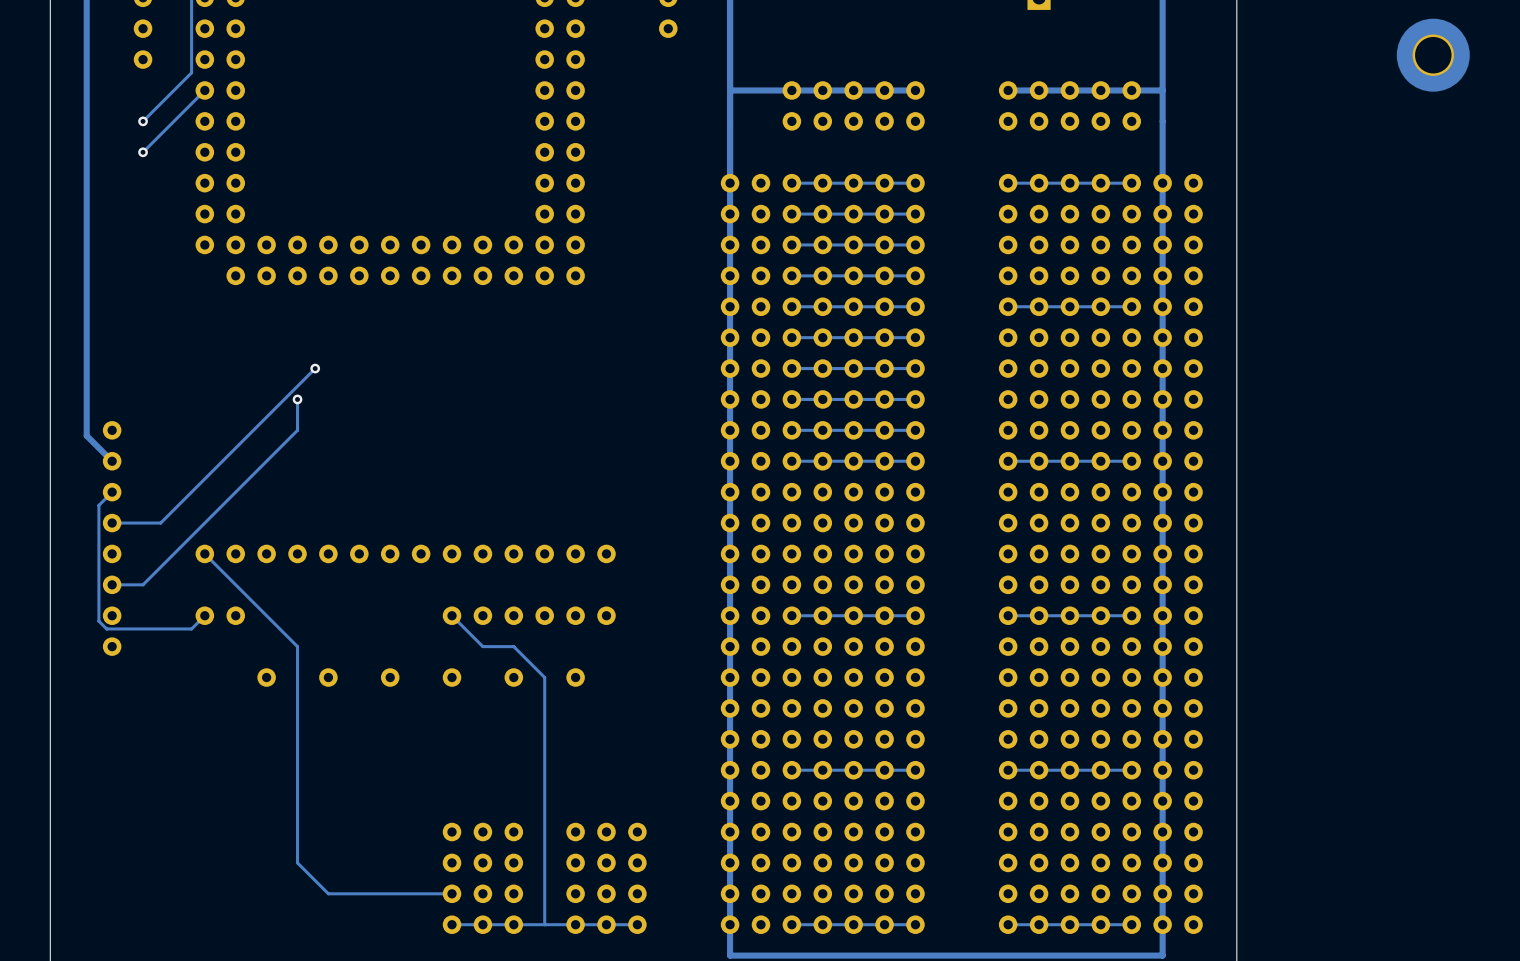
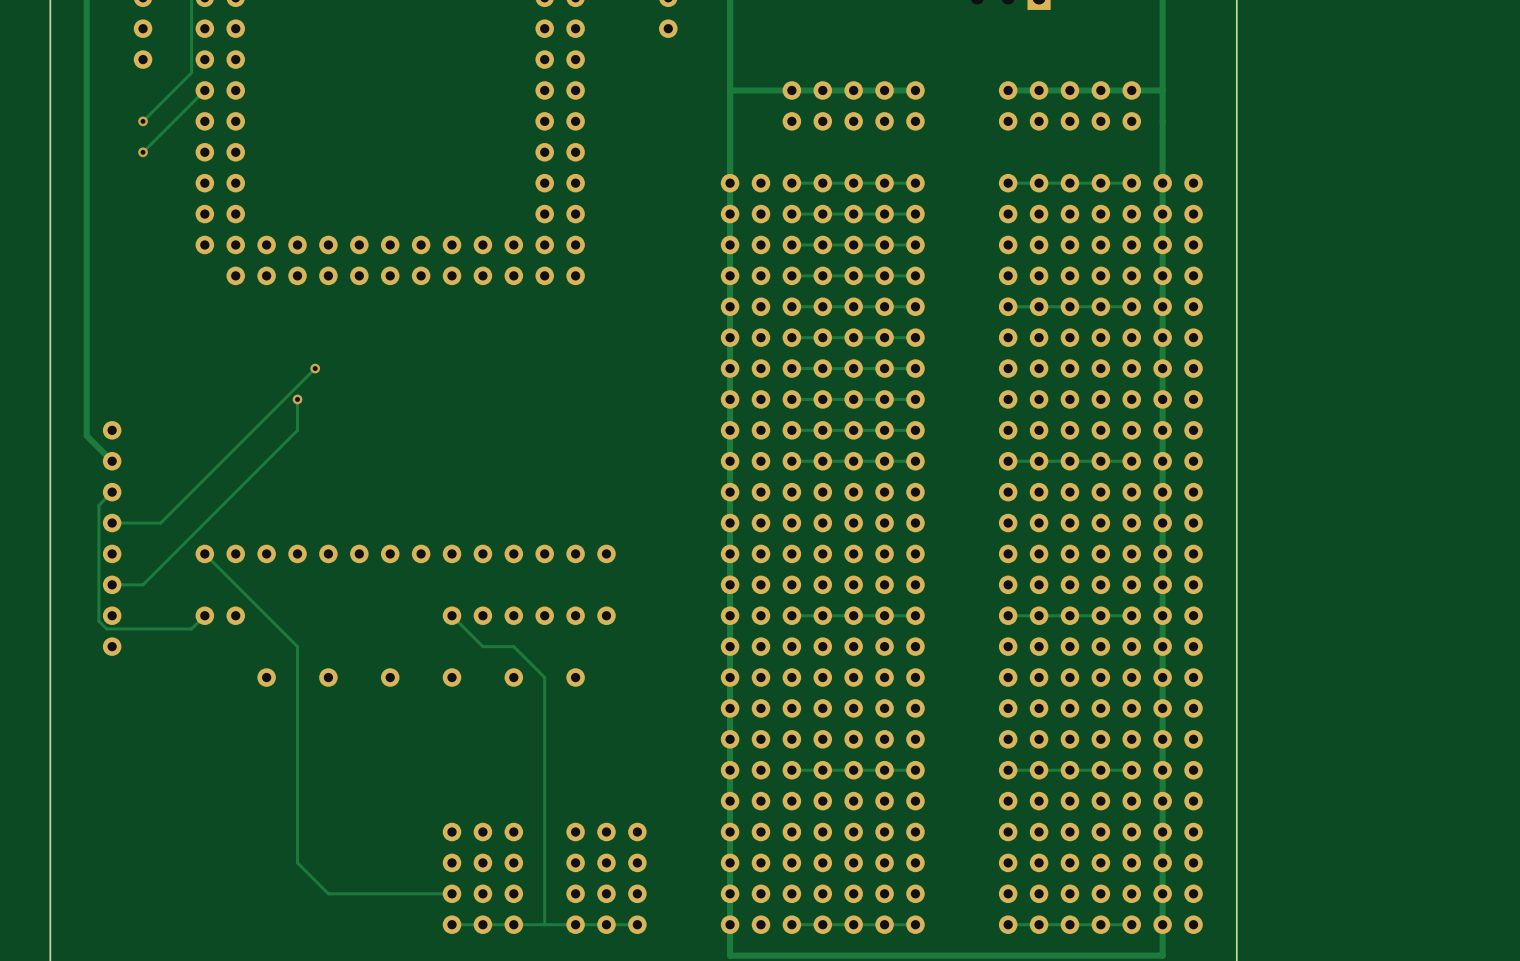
part: (1433, 55) -> none

